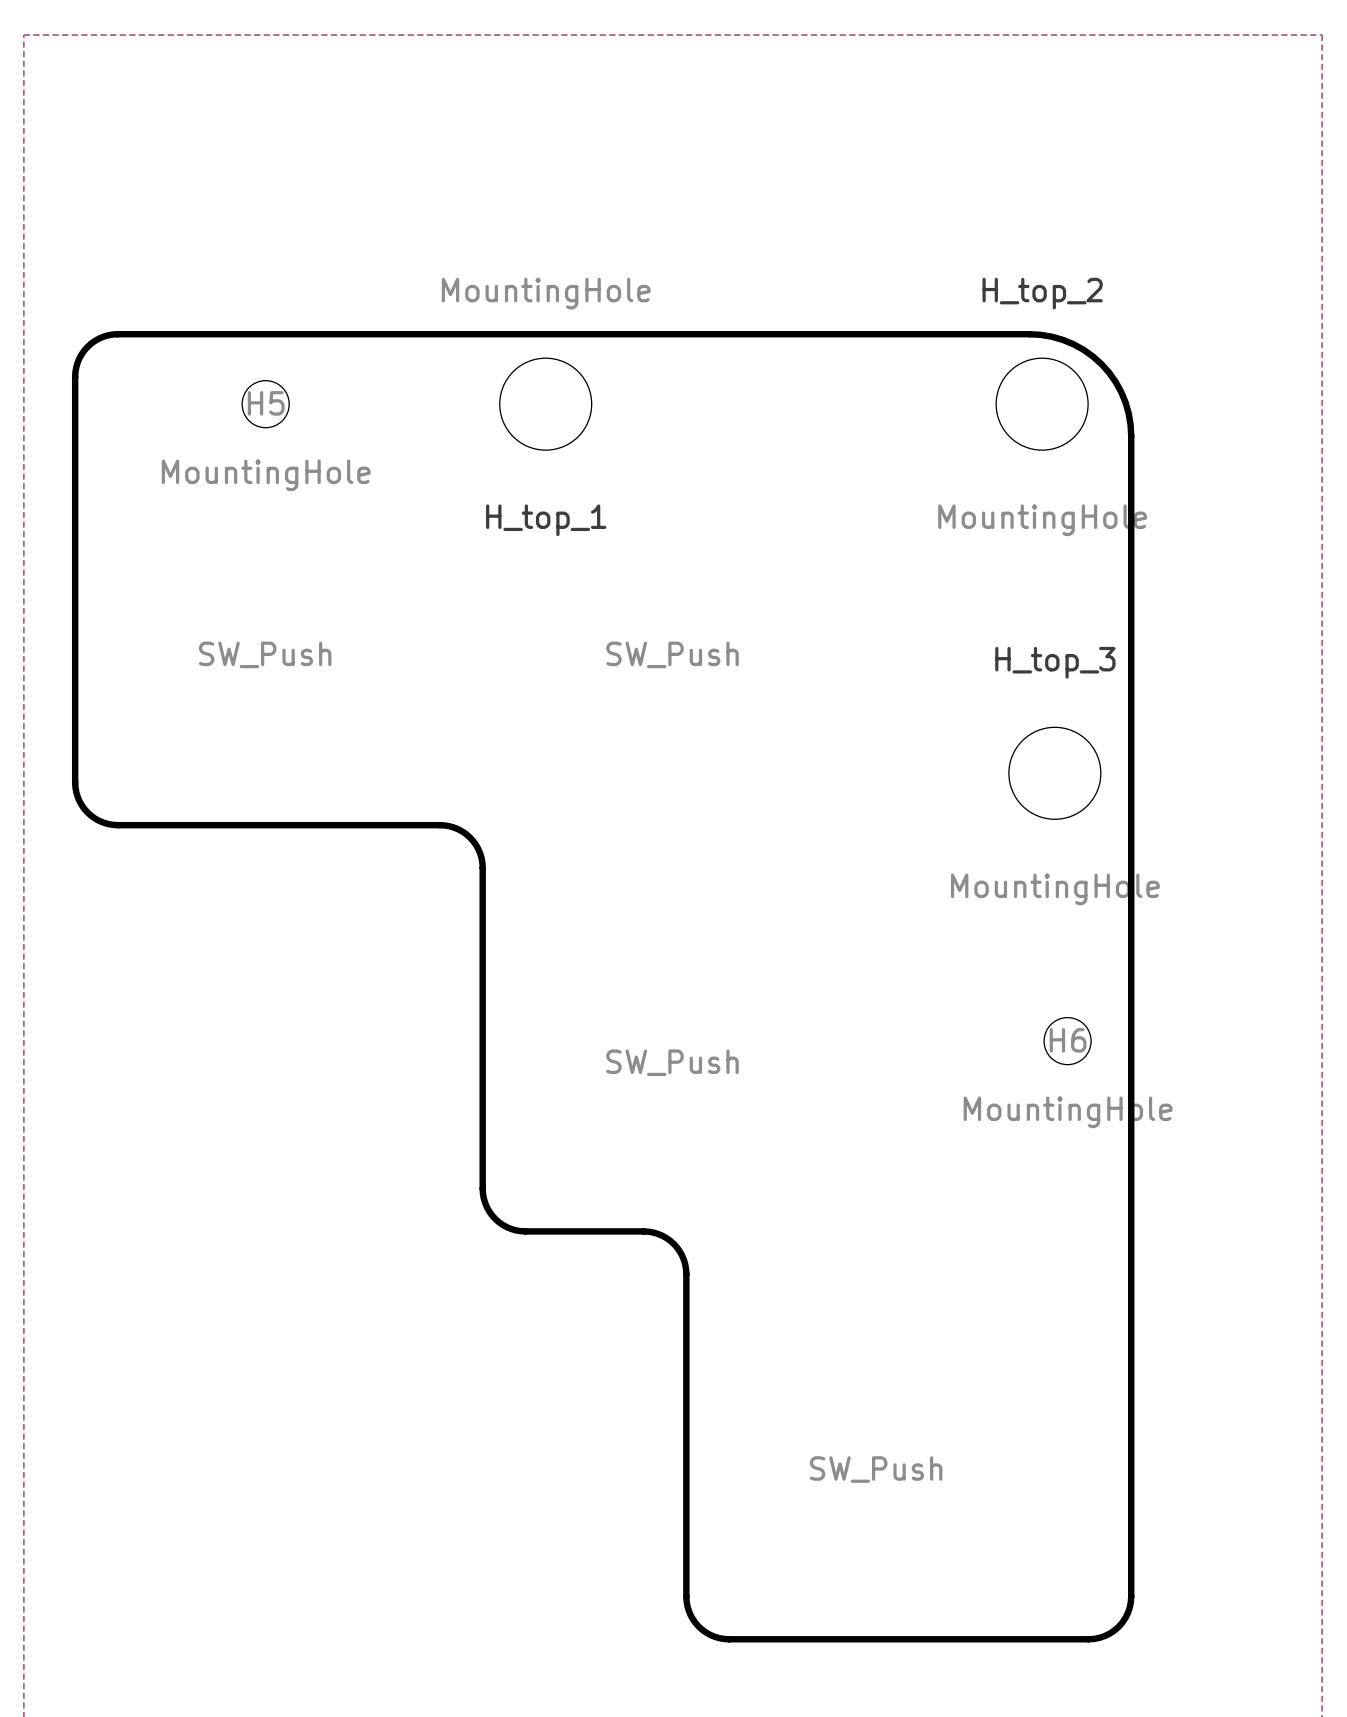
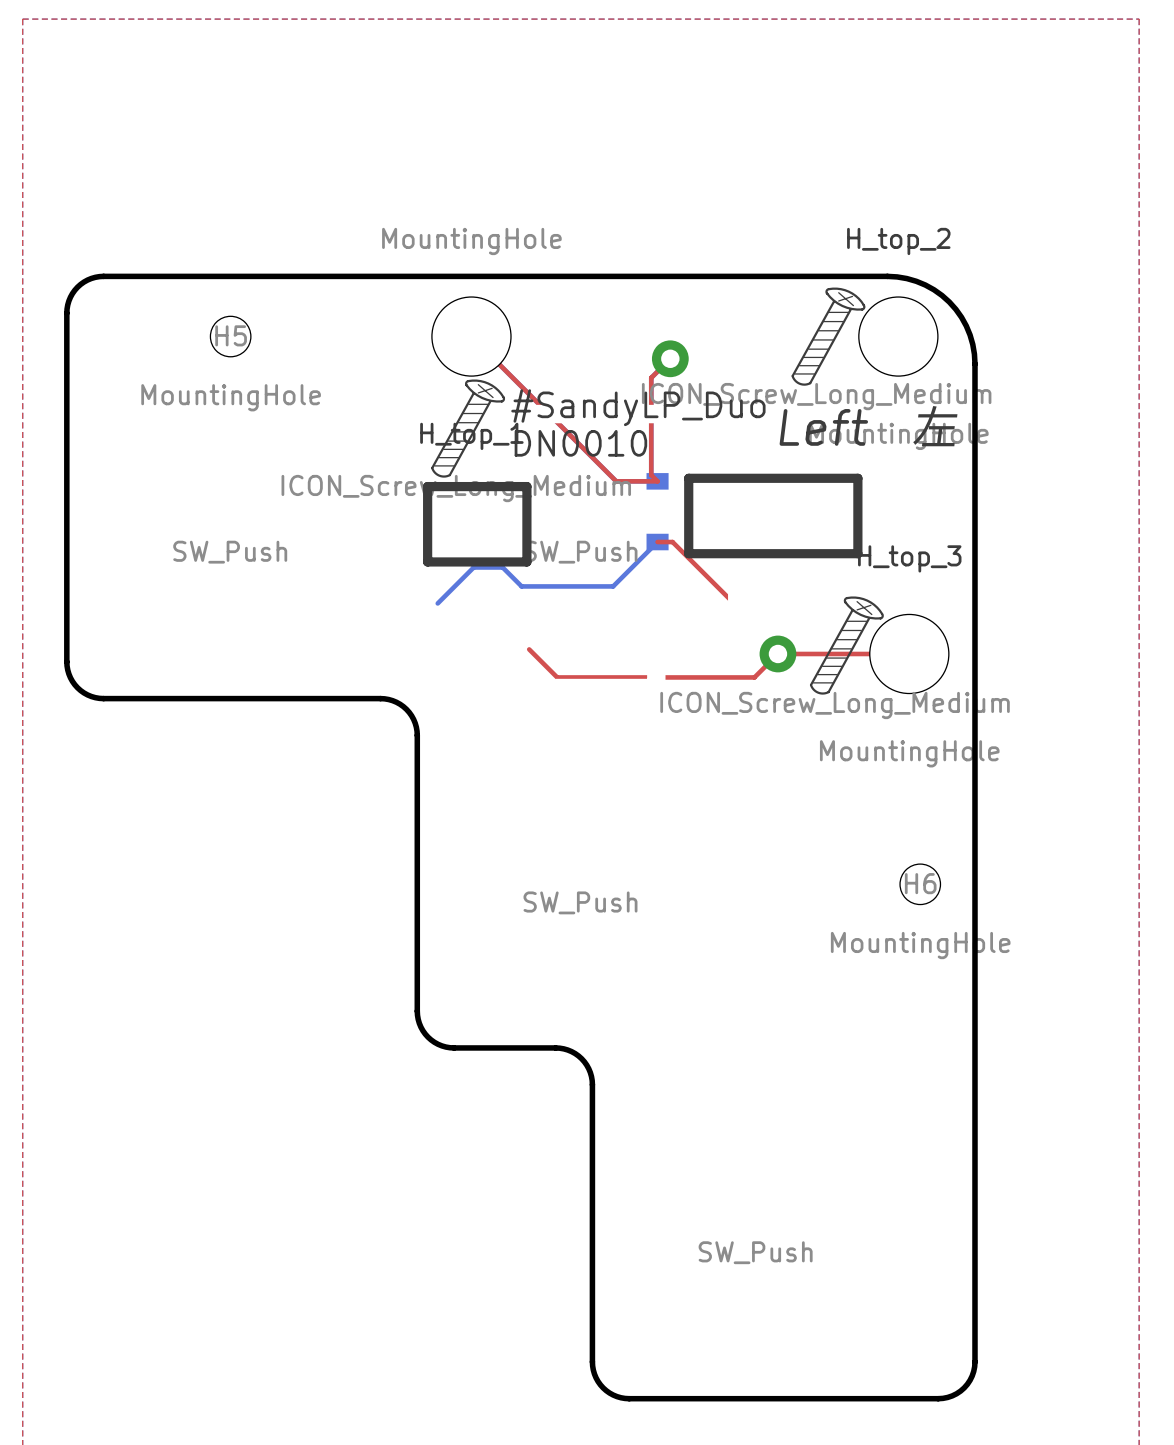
drawing: none -> [431, 287, 866, 478]
top track: none -> (471, 336) (616, 481) (657, 481) (651, 475) (651, 377) (670, 358)
part: none -> (670, 358)
text: none -> #SandyLP_Duo (638, 407)
text: none -> Left 左 (869, 426)
text: none -> DN0010 (580, 443)
line: none -> (688, 478) (857, 478) (857, 553) (688, 553) (688, 478)
line: none -> (427, 486) (526, 486) (526, 561) (427, 561) (427, 486)
part: none -> (657, 511)
top track: none -> (657, 542) (672, 542) (733, 602)
bottom track: none -> (657, 542) (613, 586) (521, 586) (502, 567) (473, 567) (437, 603)
drawing: none -> [809, 596, 884, 695]
top track: none -> (529, 649) (557, 677) (754, 677) (777, 653) (909, 653)
part: none -> (777, 653)

